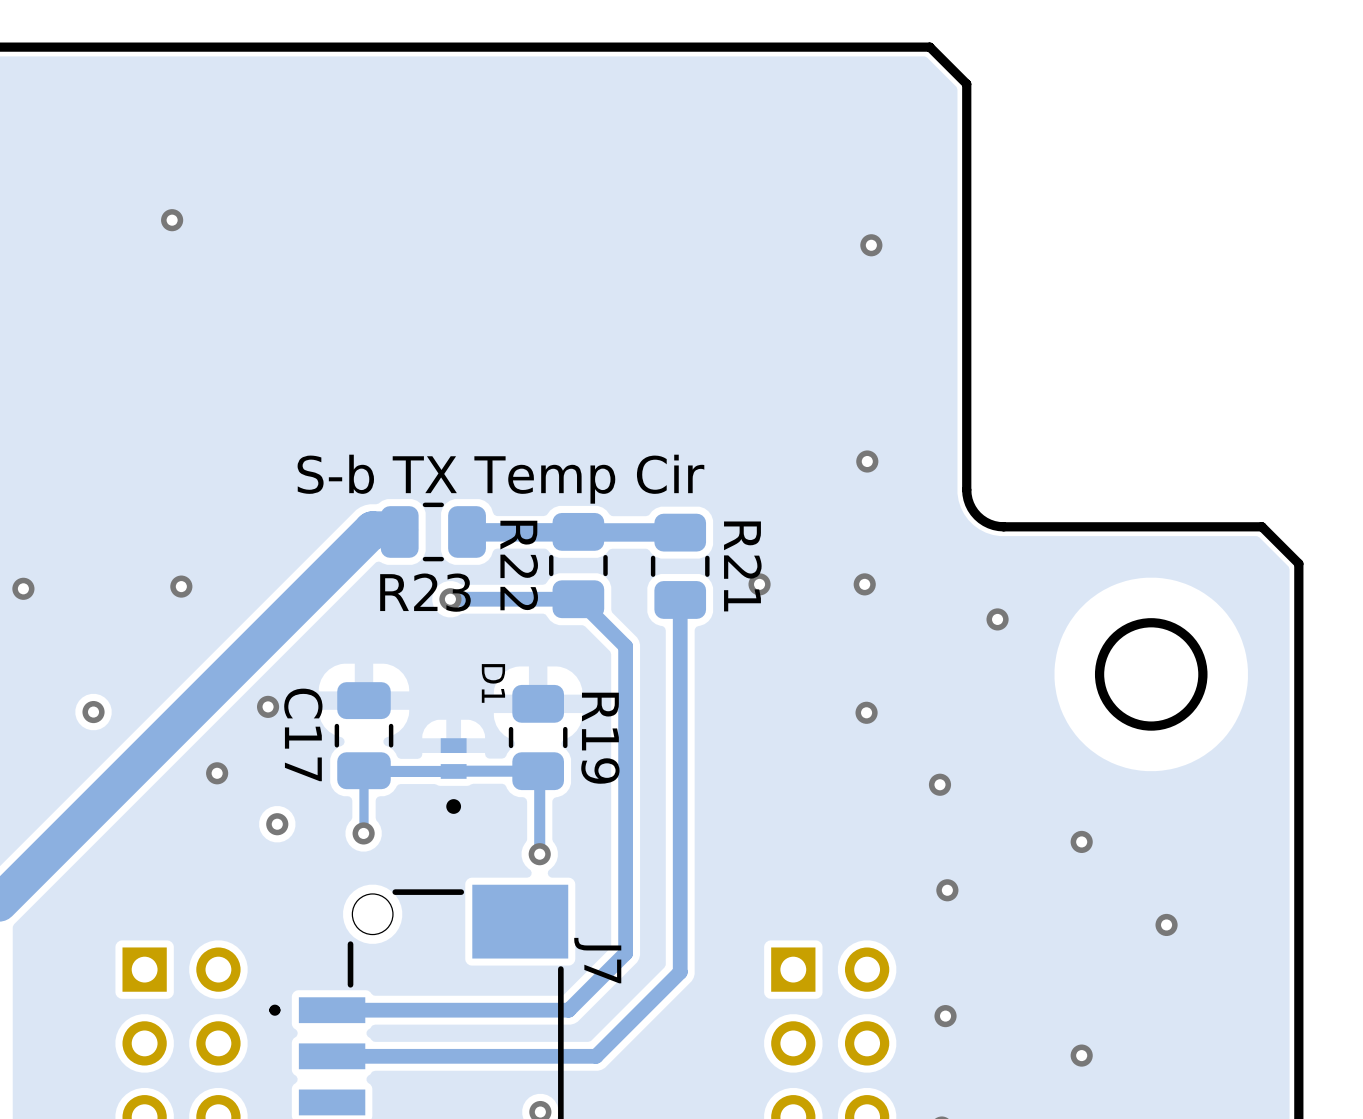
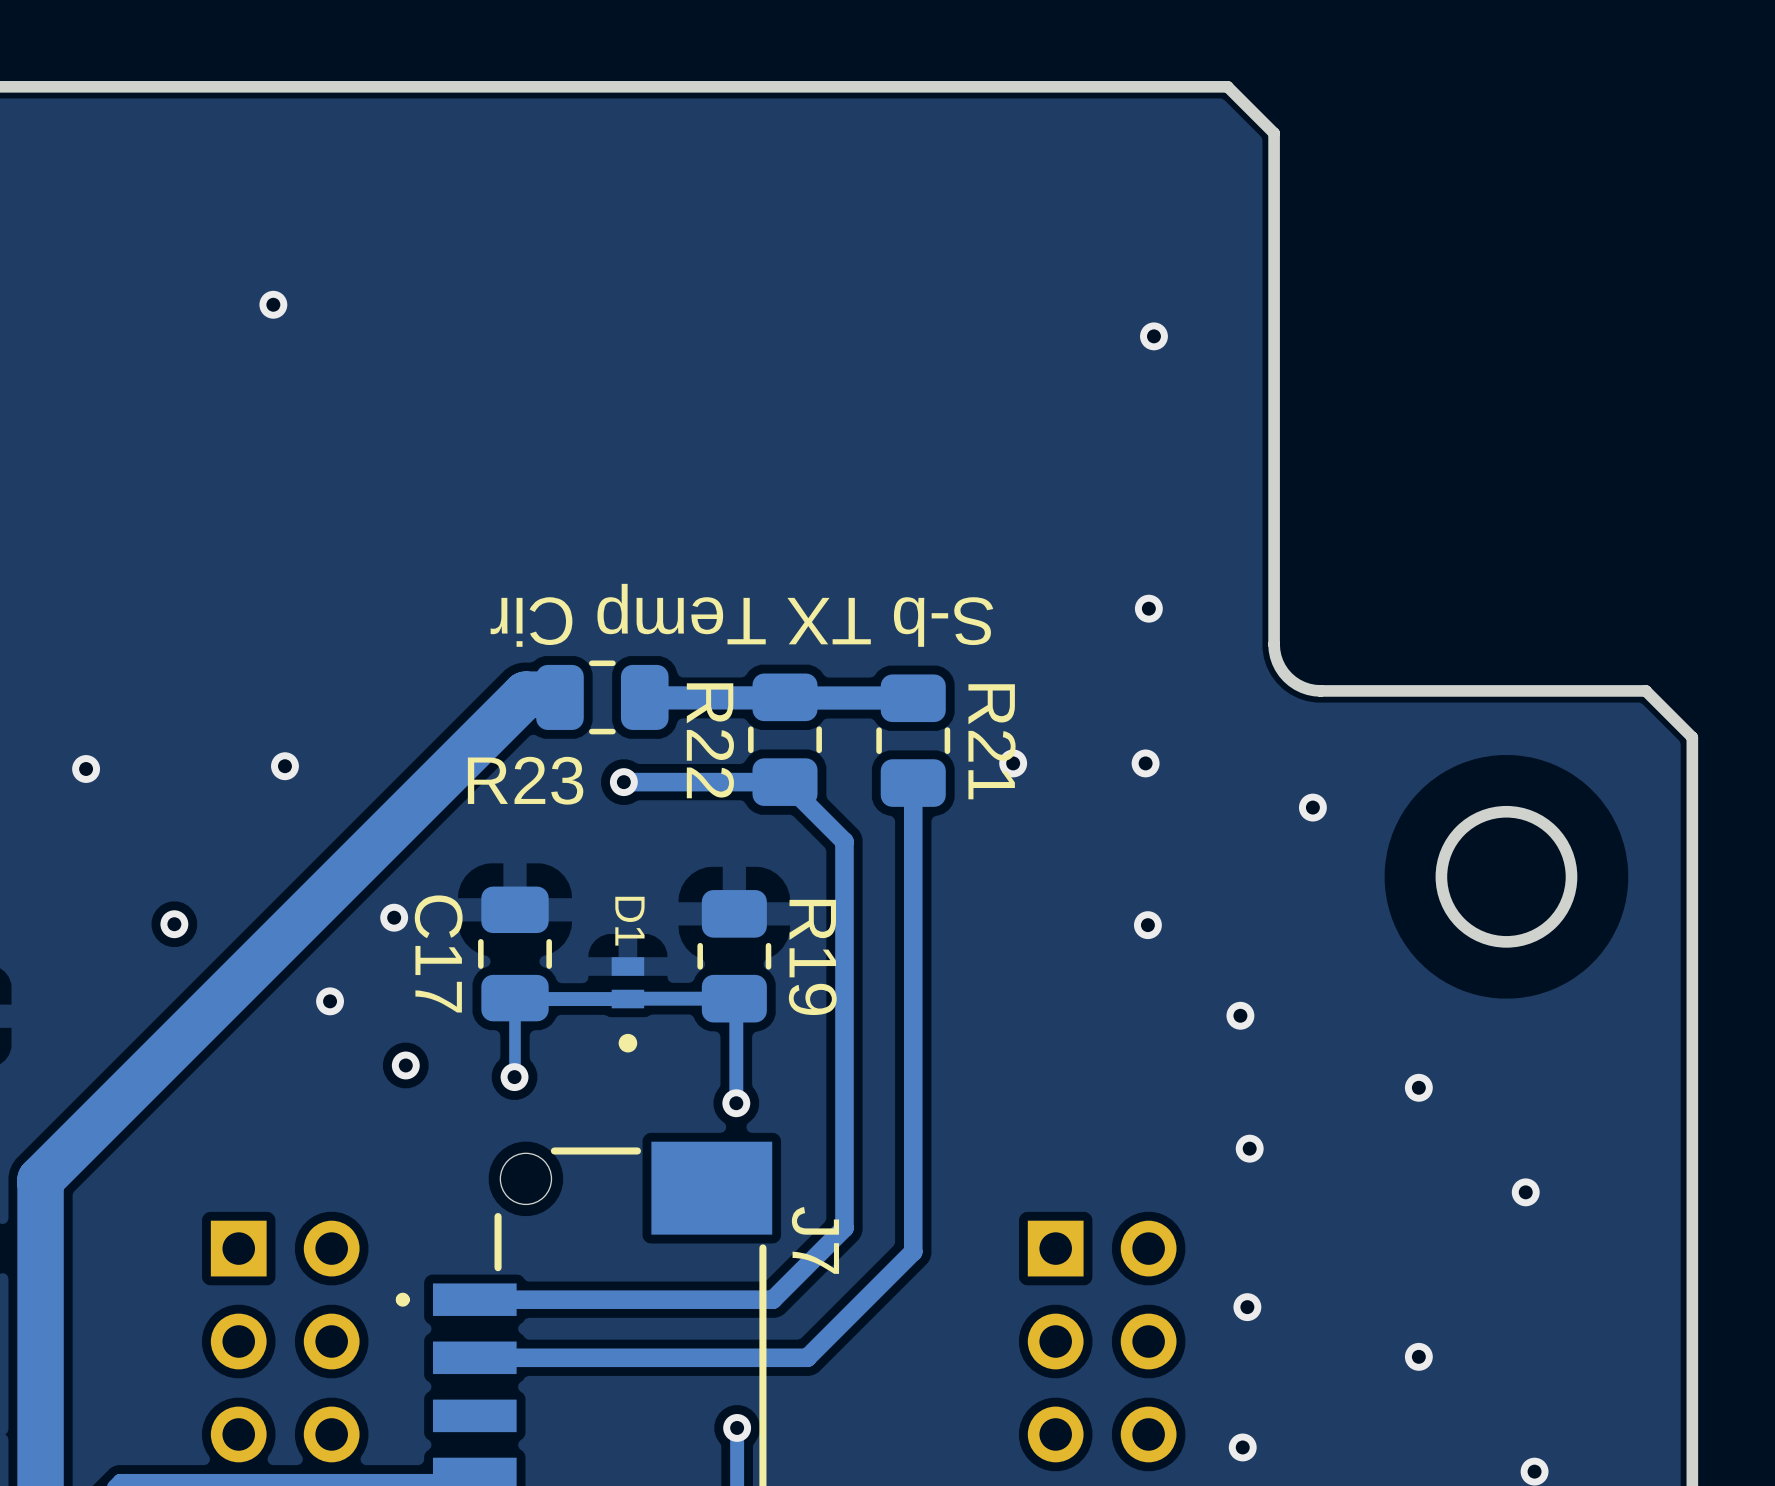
text rotation: 0° (500, 479) -> 180° (741, 615)
R23 name position: R23 (425, 592) -> R23 (525, 780)
D1 name position: D1 (493, 683) -> D1 (629, 921)

